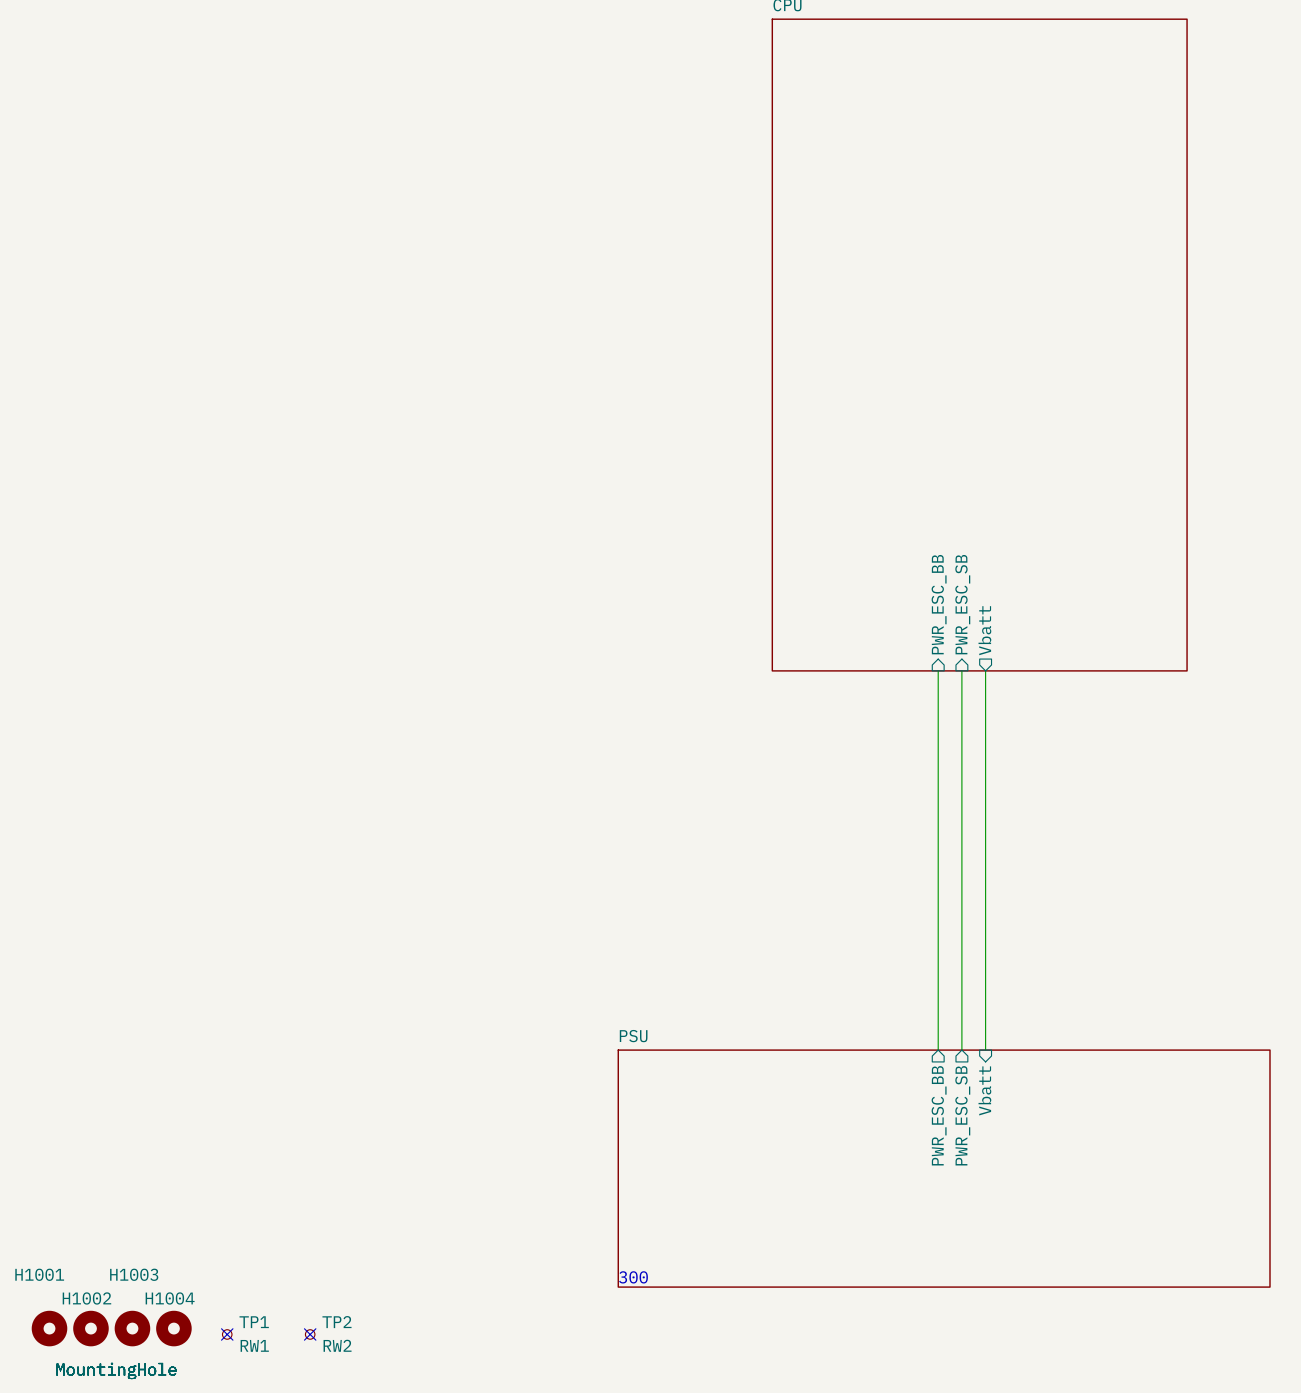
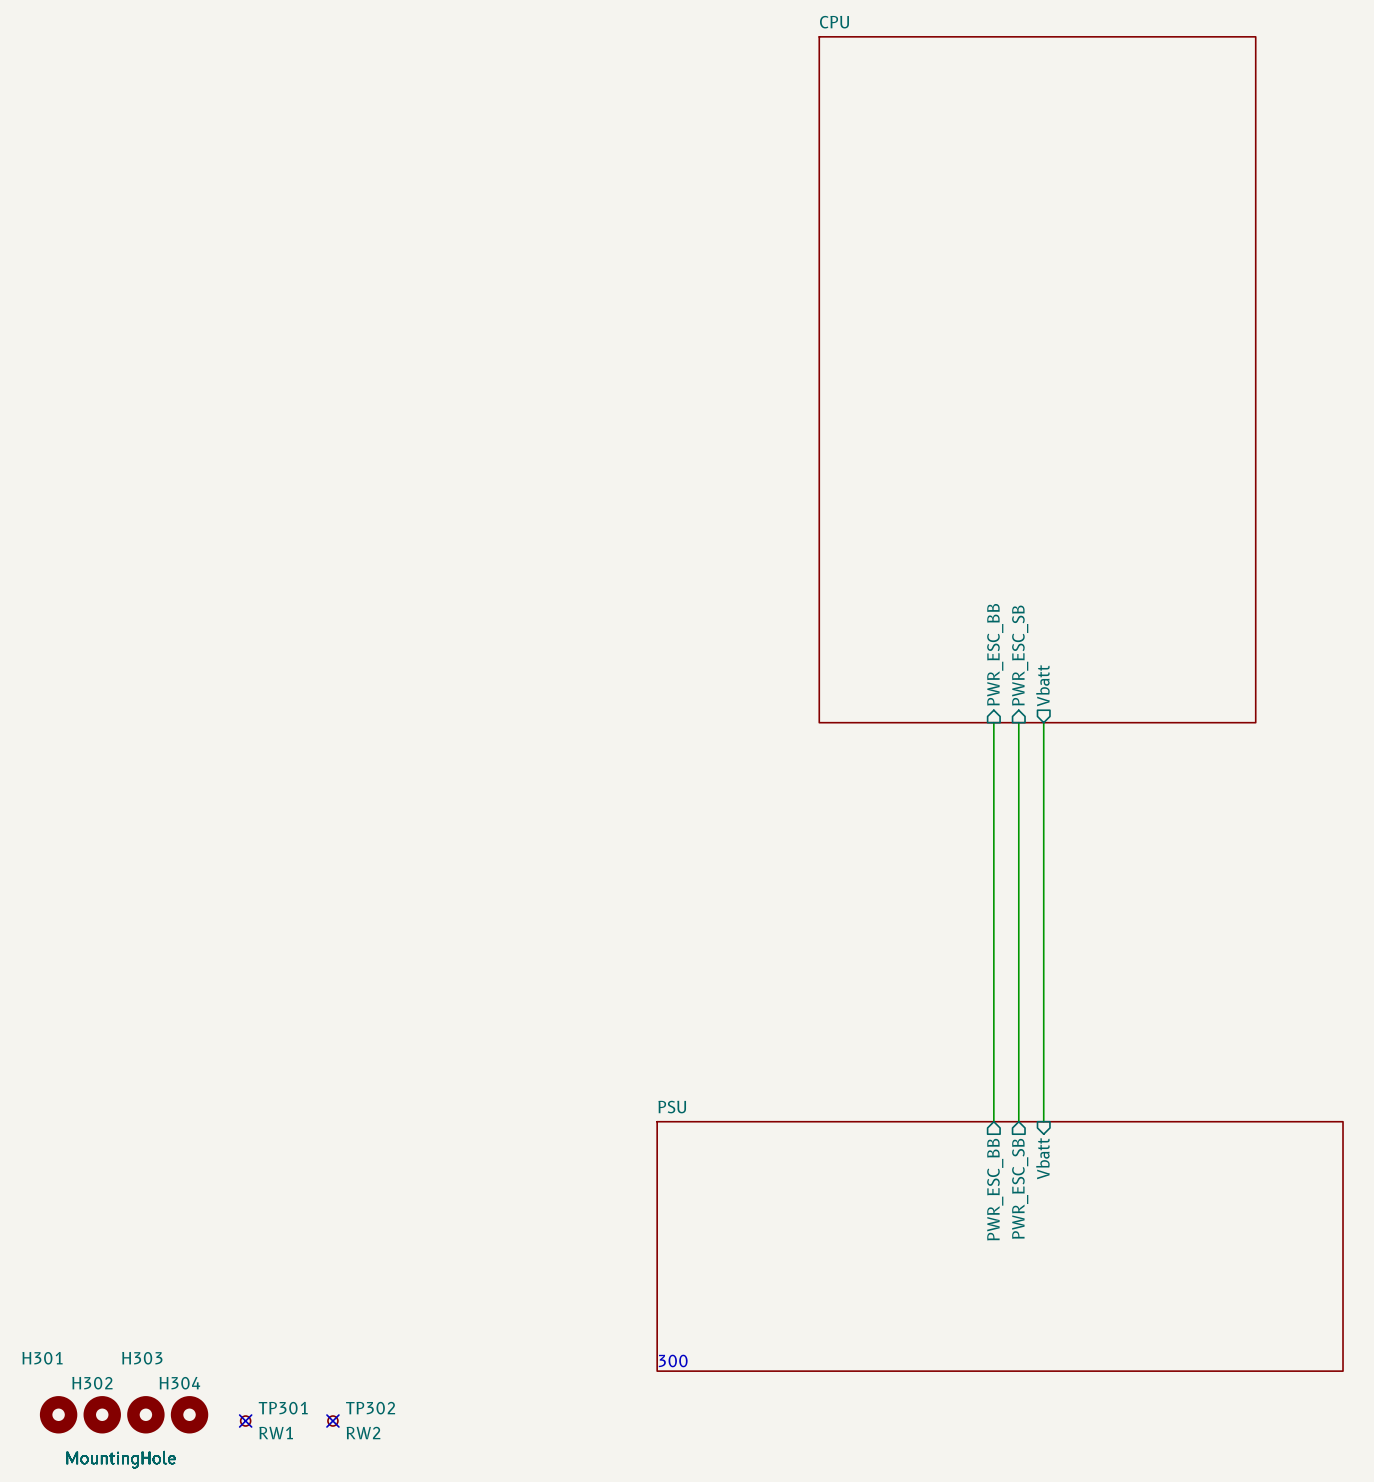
H1001 name: H1001 (39, 1274) -> H301 (42, 1358)
H1003 name: H1003 (134, 1274) -> H303 (142, 1358)
H1002 name: H1002 (86, 1298) -> H302 (92, 1383)
H1004 name: H1004 (170, 1298) -> H304 (179, 1383)
TP1 name: TP1 (254, 1322) -> TP301 (283, 1408)
TP2 name: TP2 (336, 1322) -> TP302 (370, 1408)

